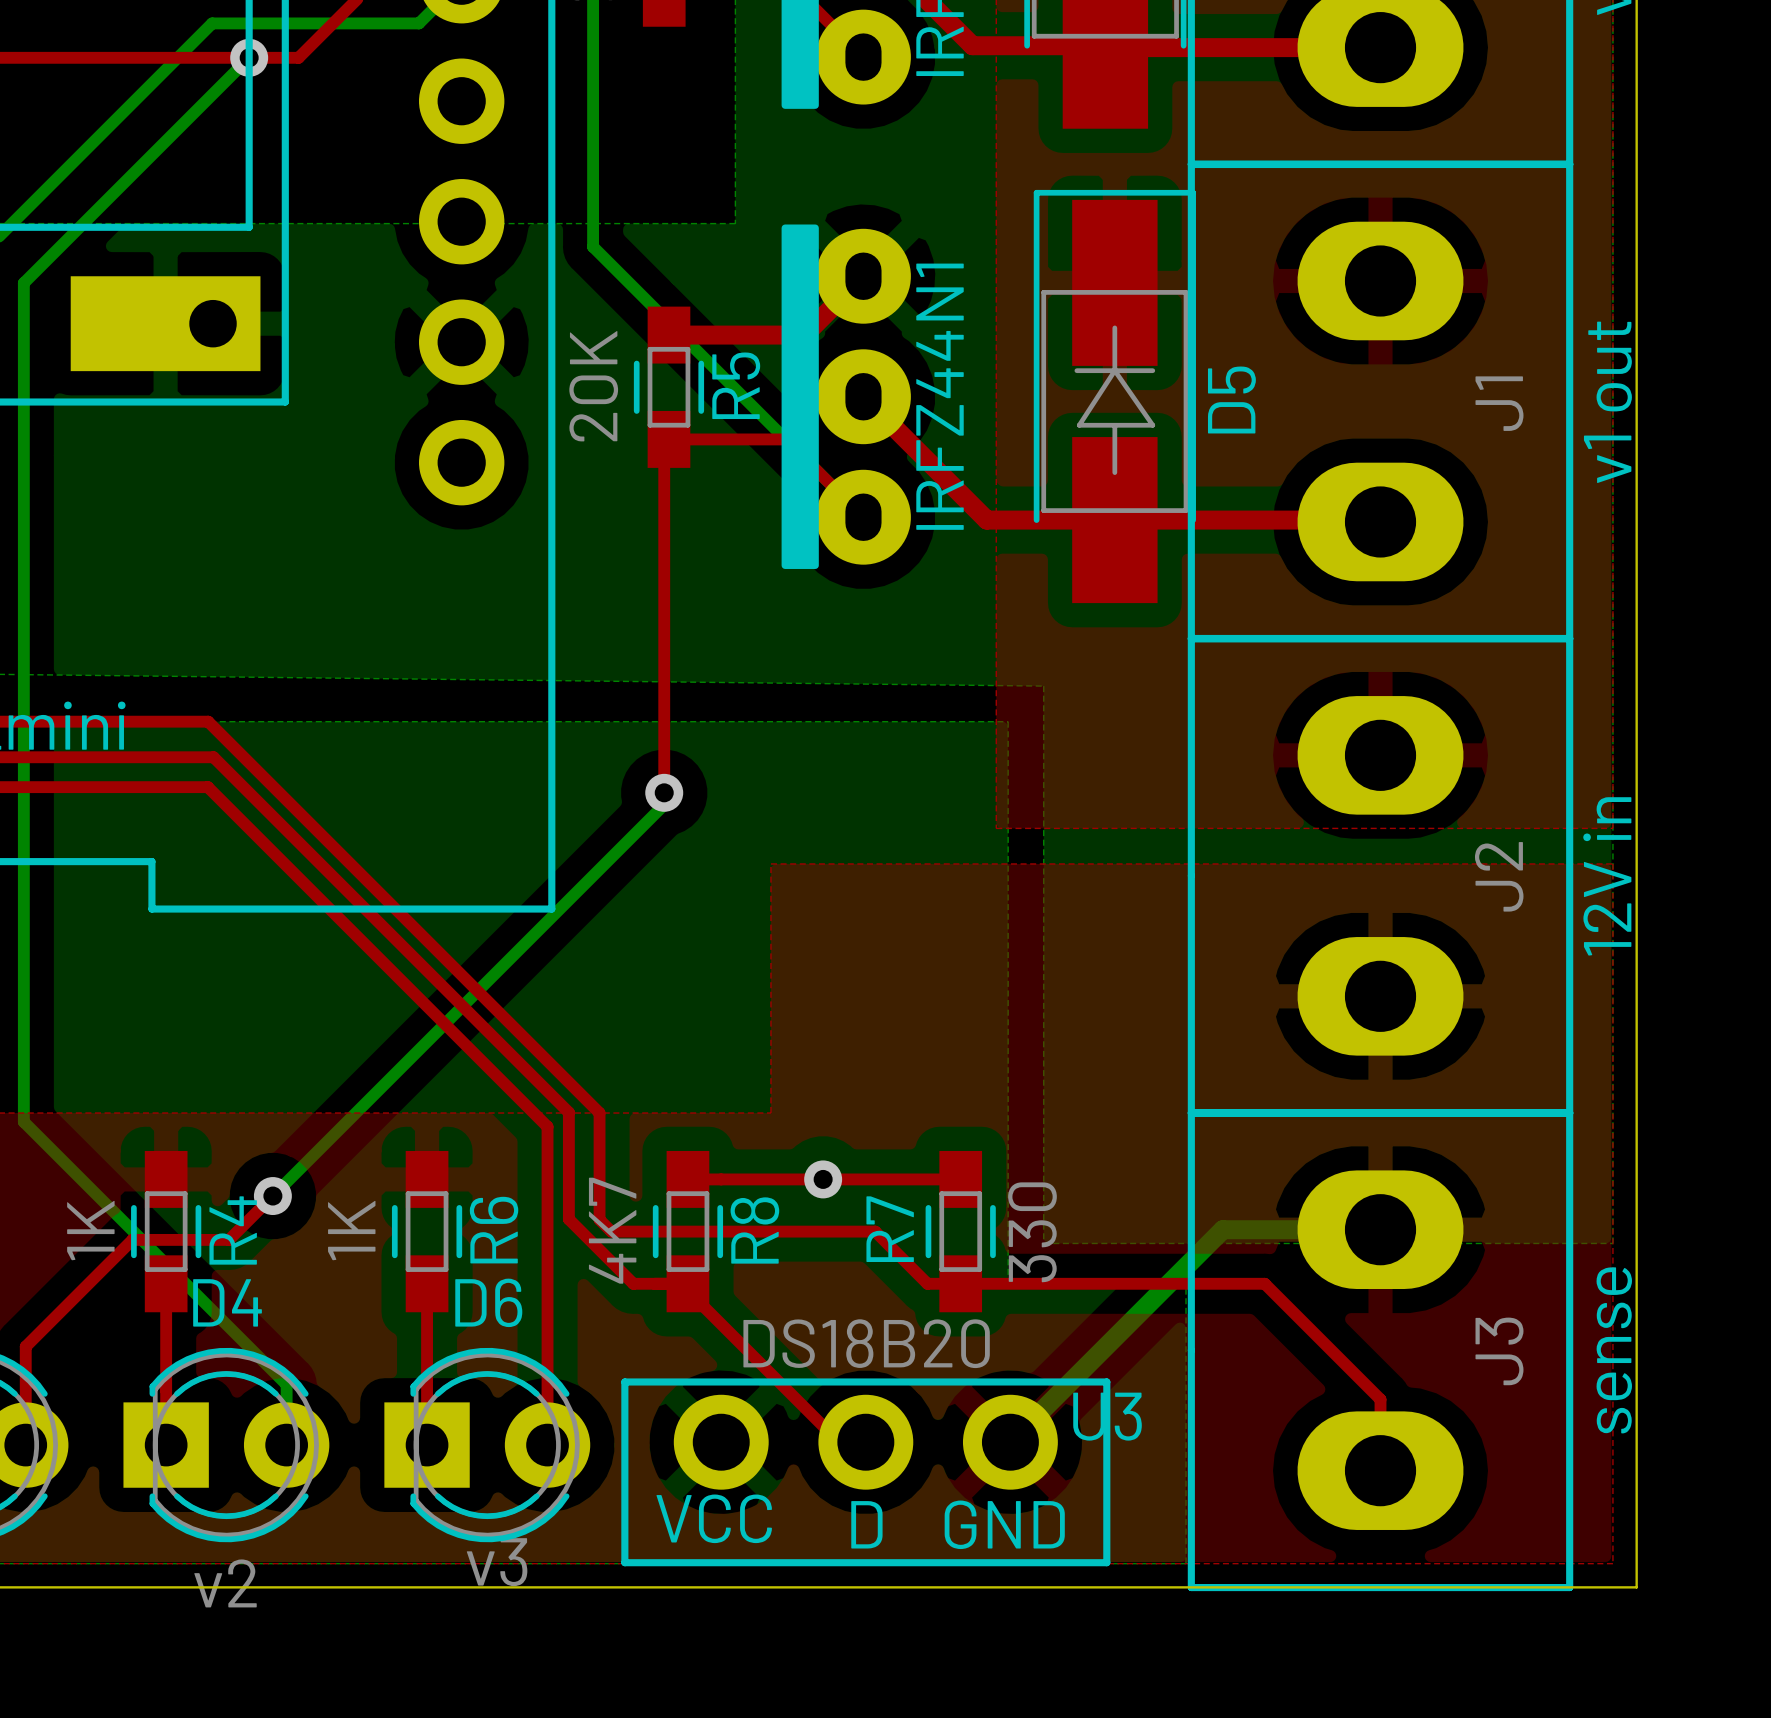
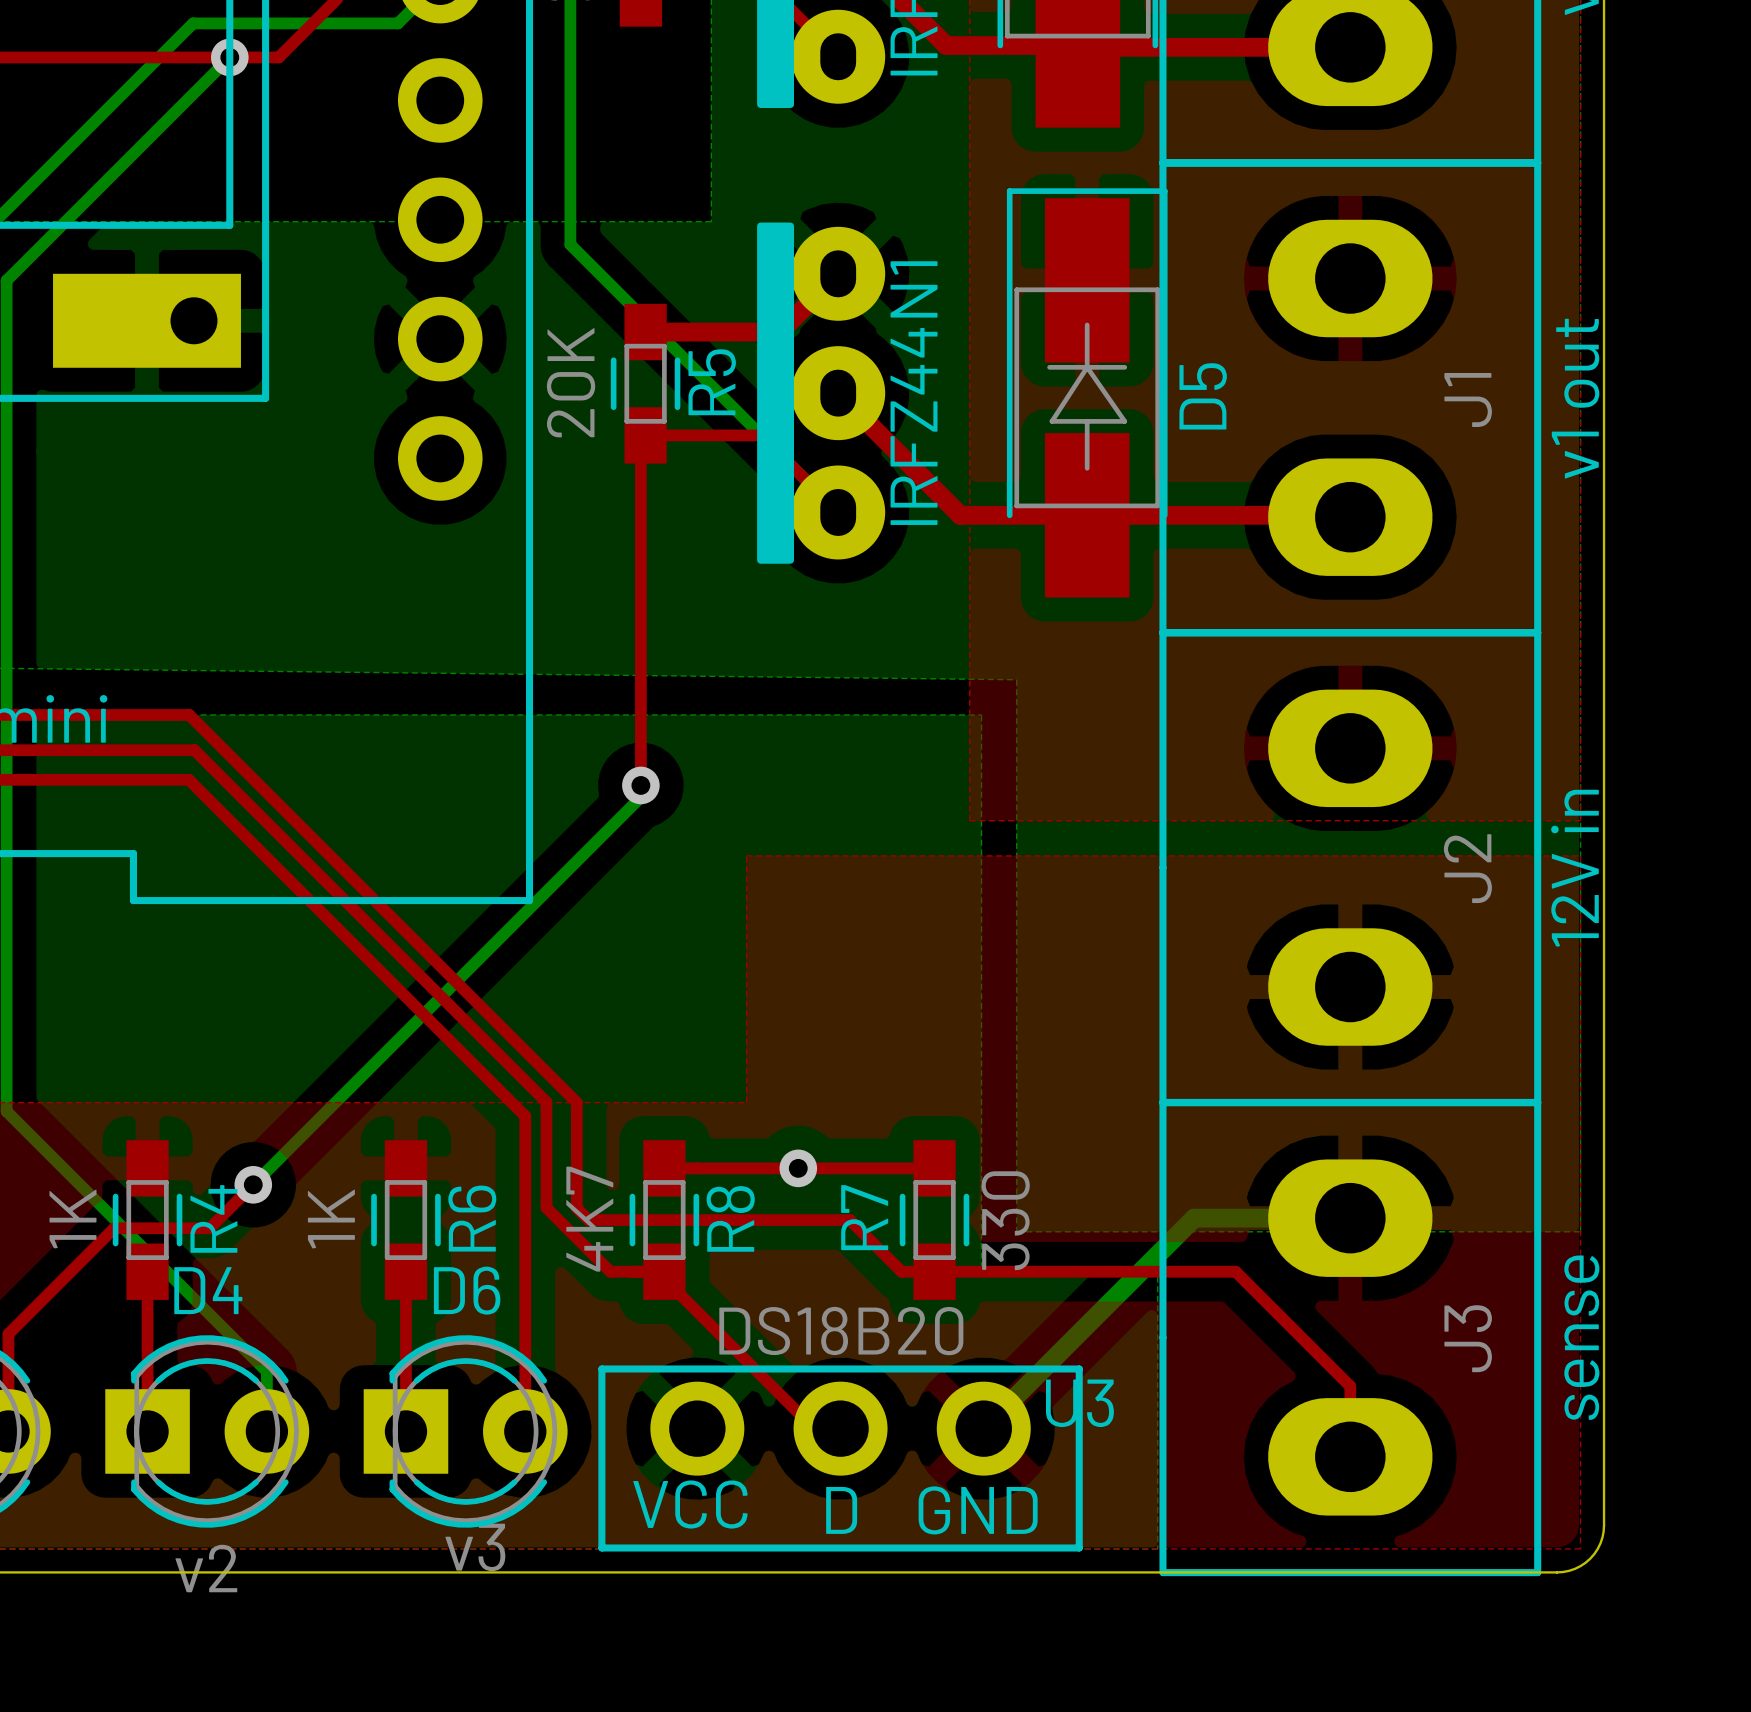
board edge: (1636, 1539) (1636, 1587) (1589, 1587) -> (1604, 1525) (1600, 1543) (1590, 1558) (1575, 1568) (1557, 1572)

